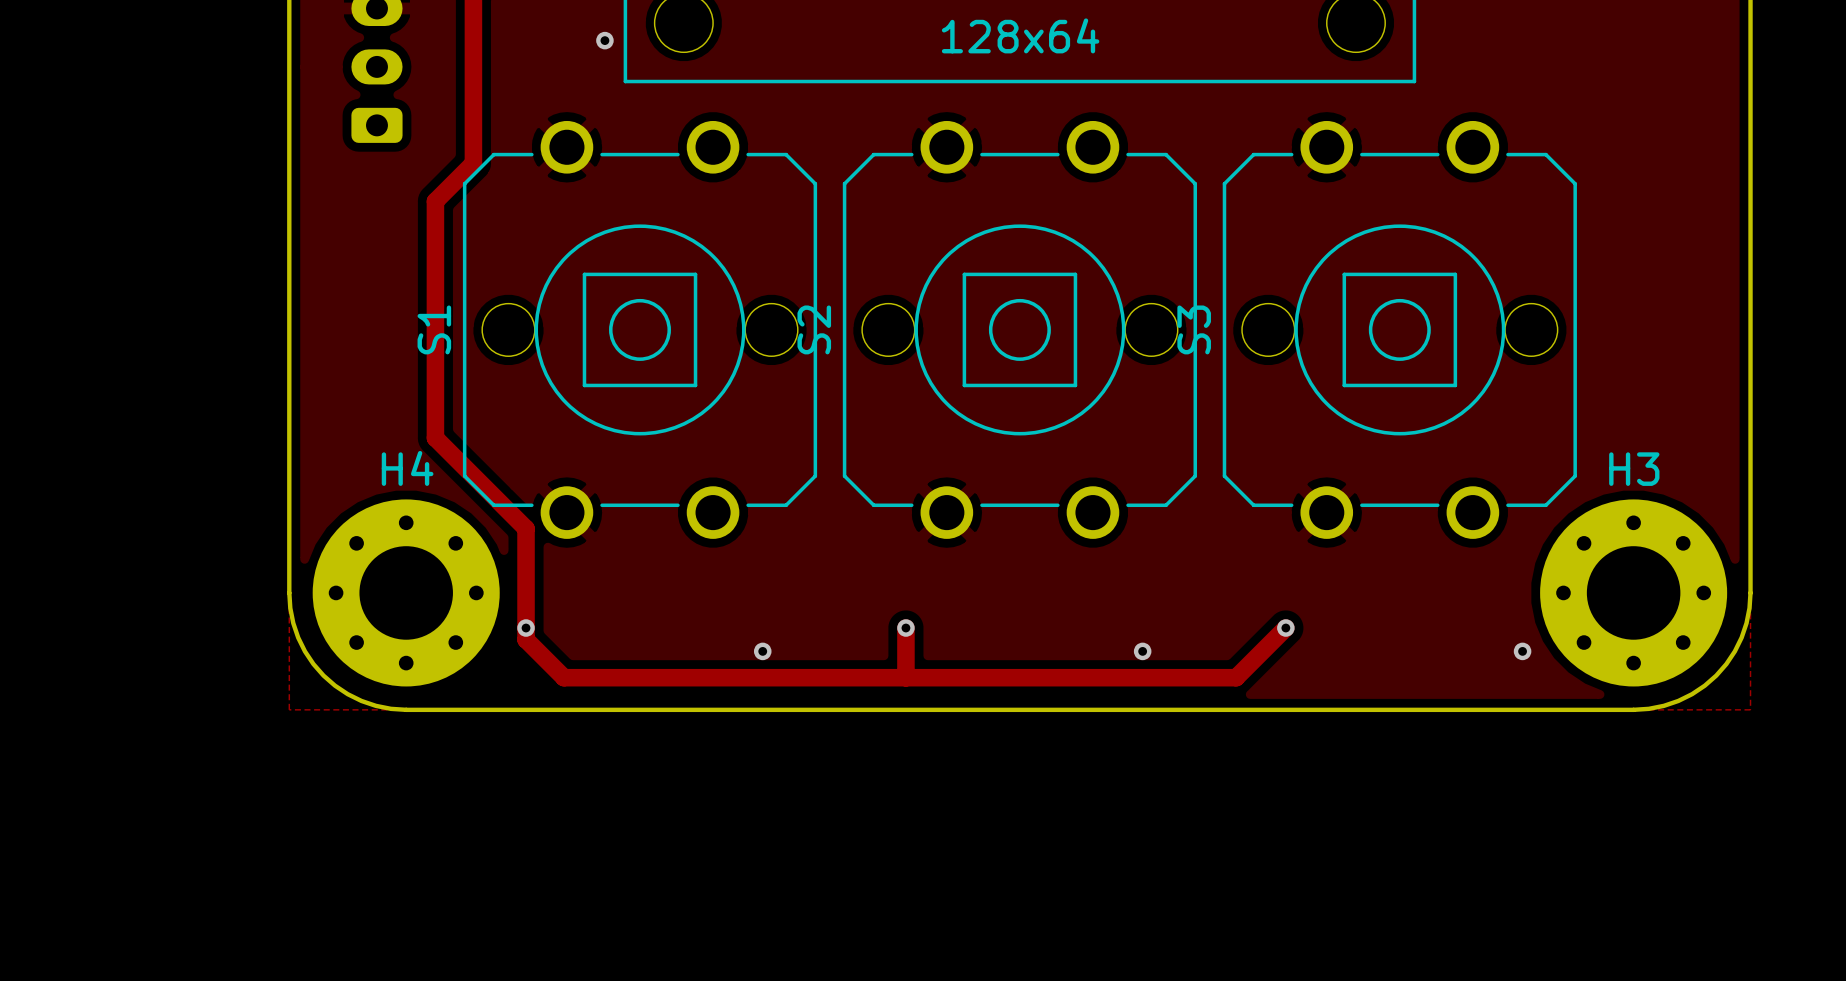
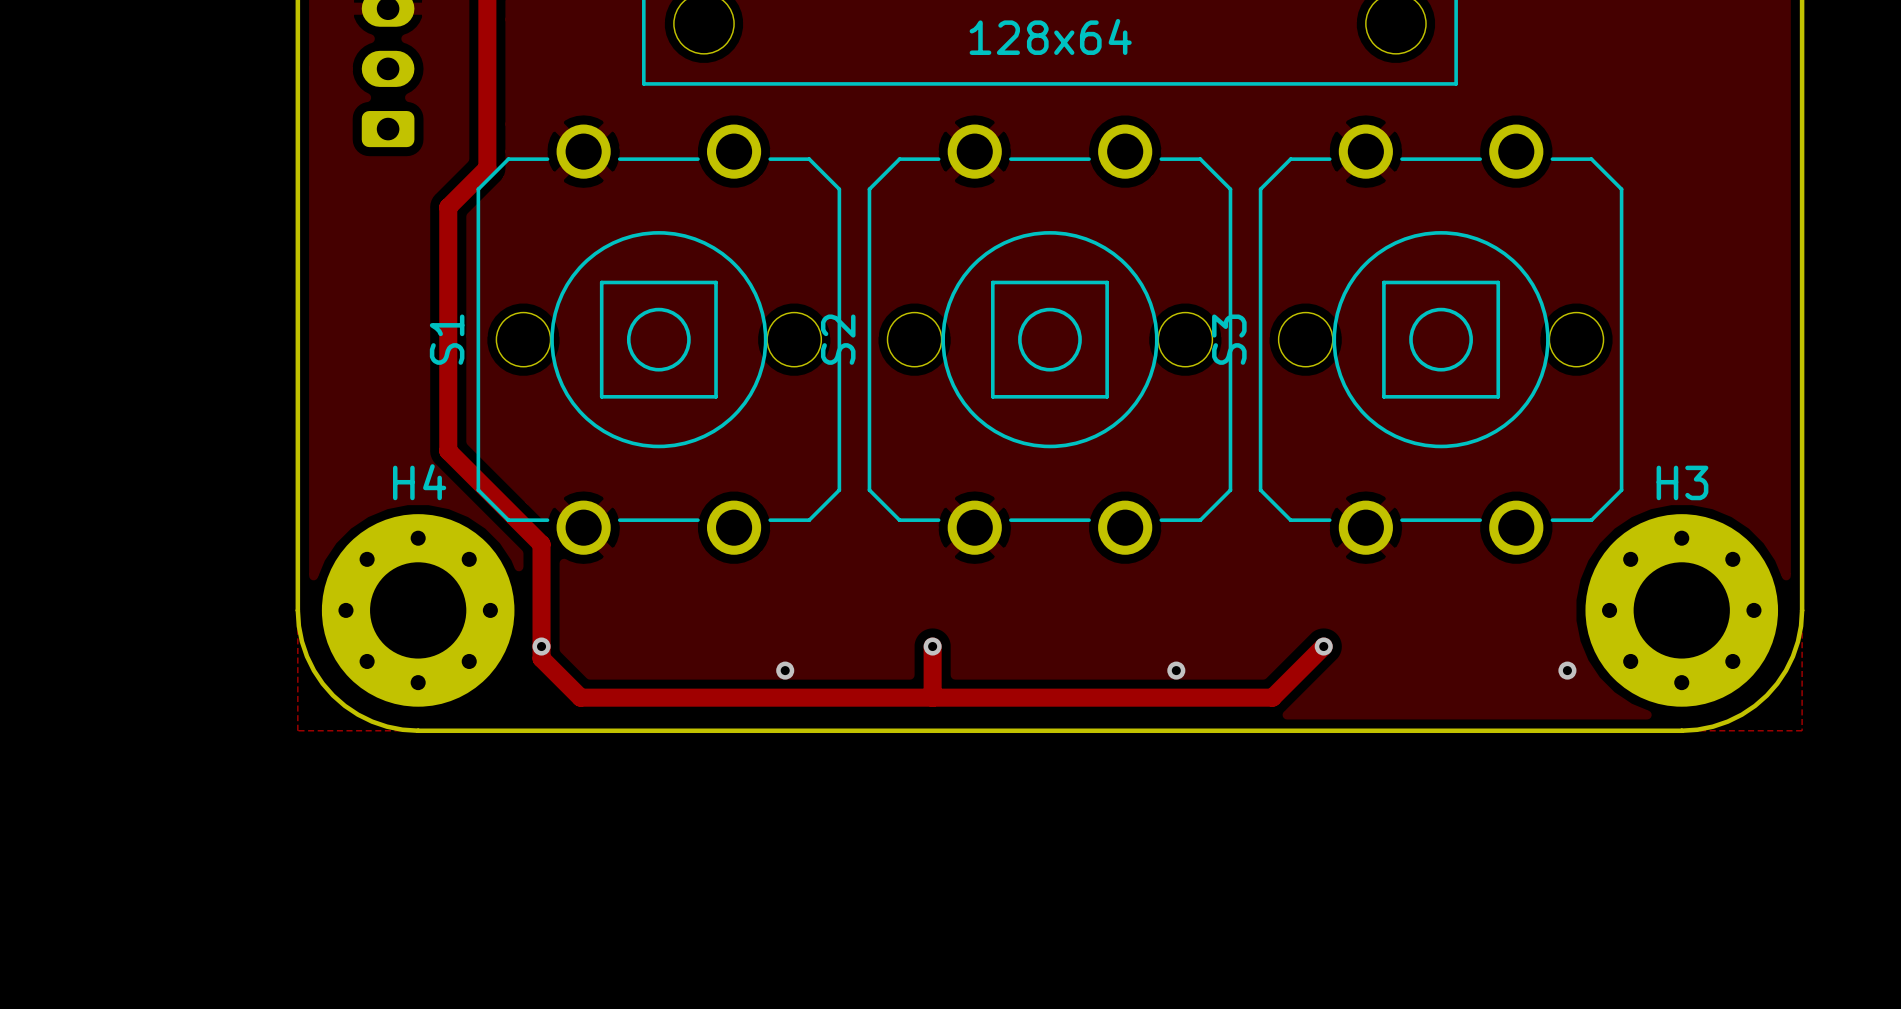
via: (604, 40) -> none

